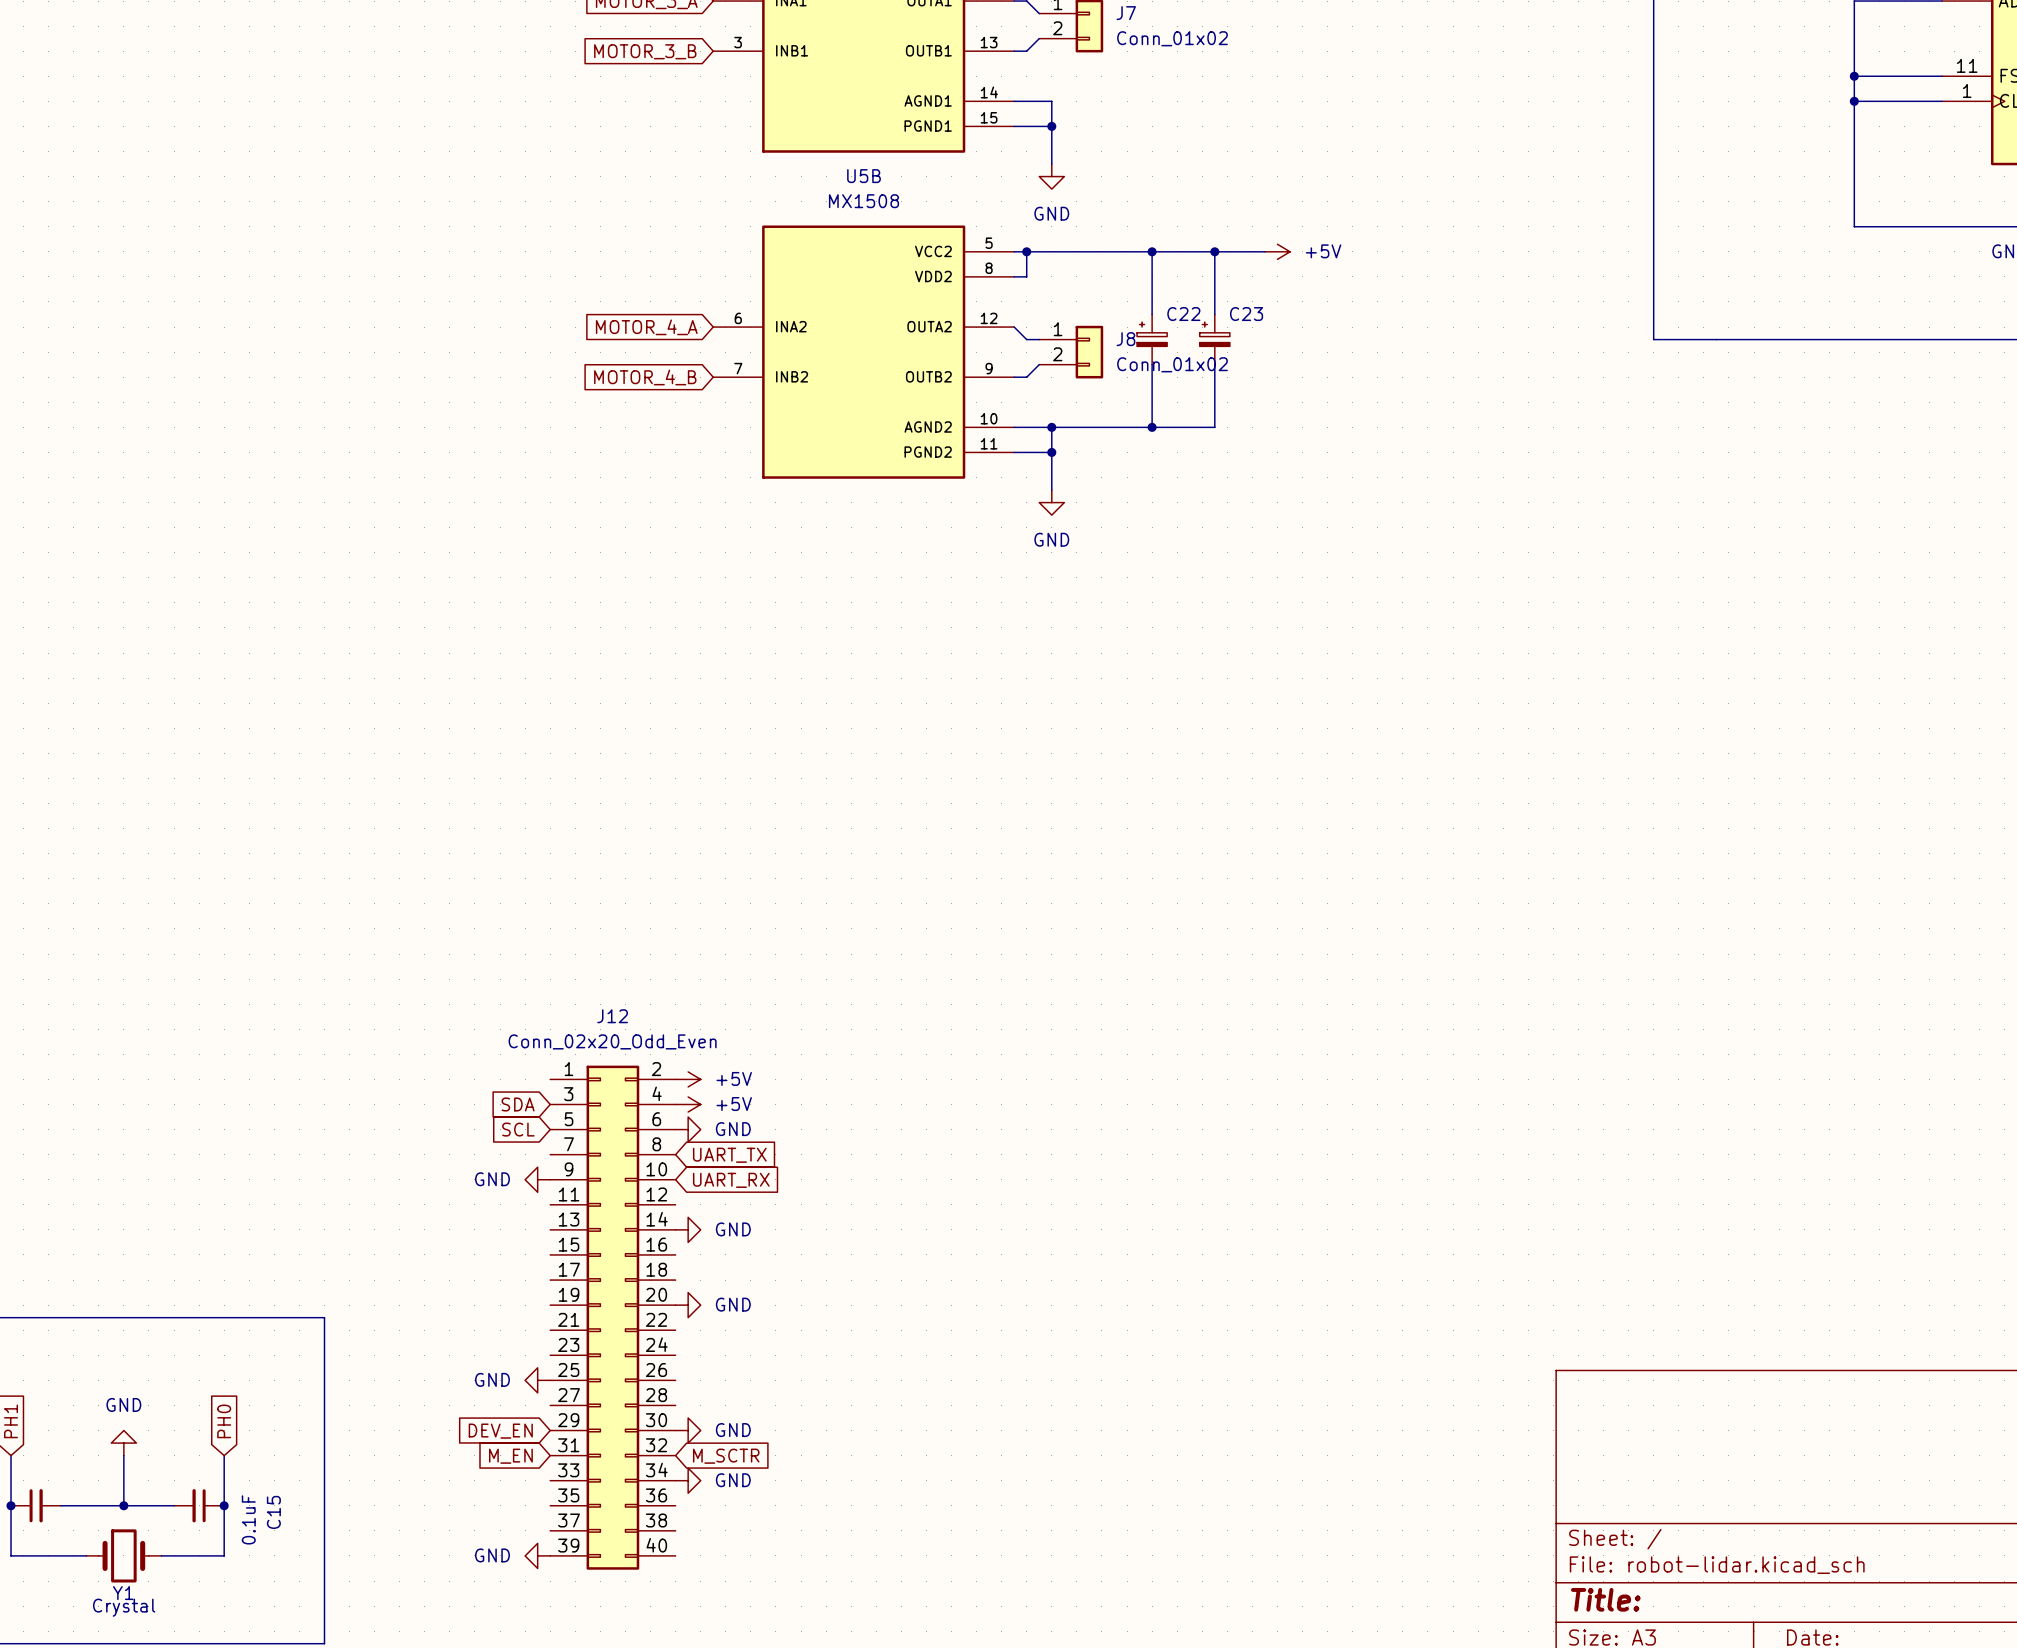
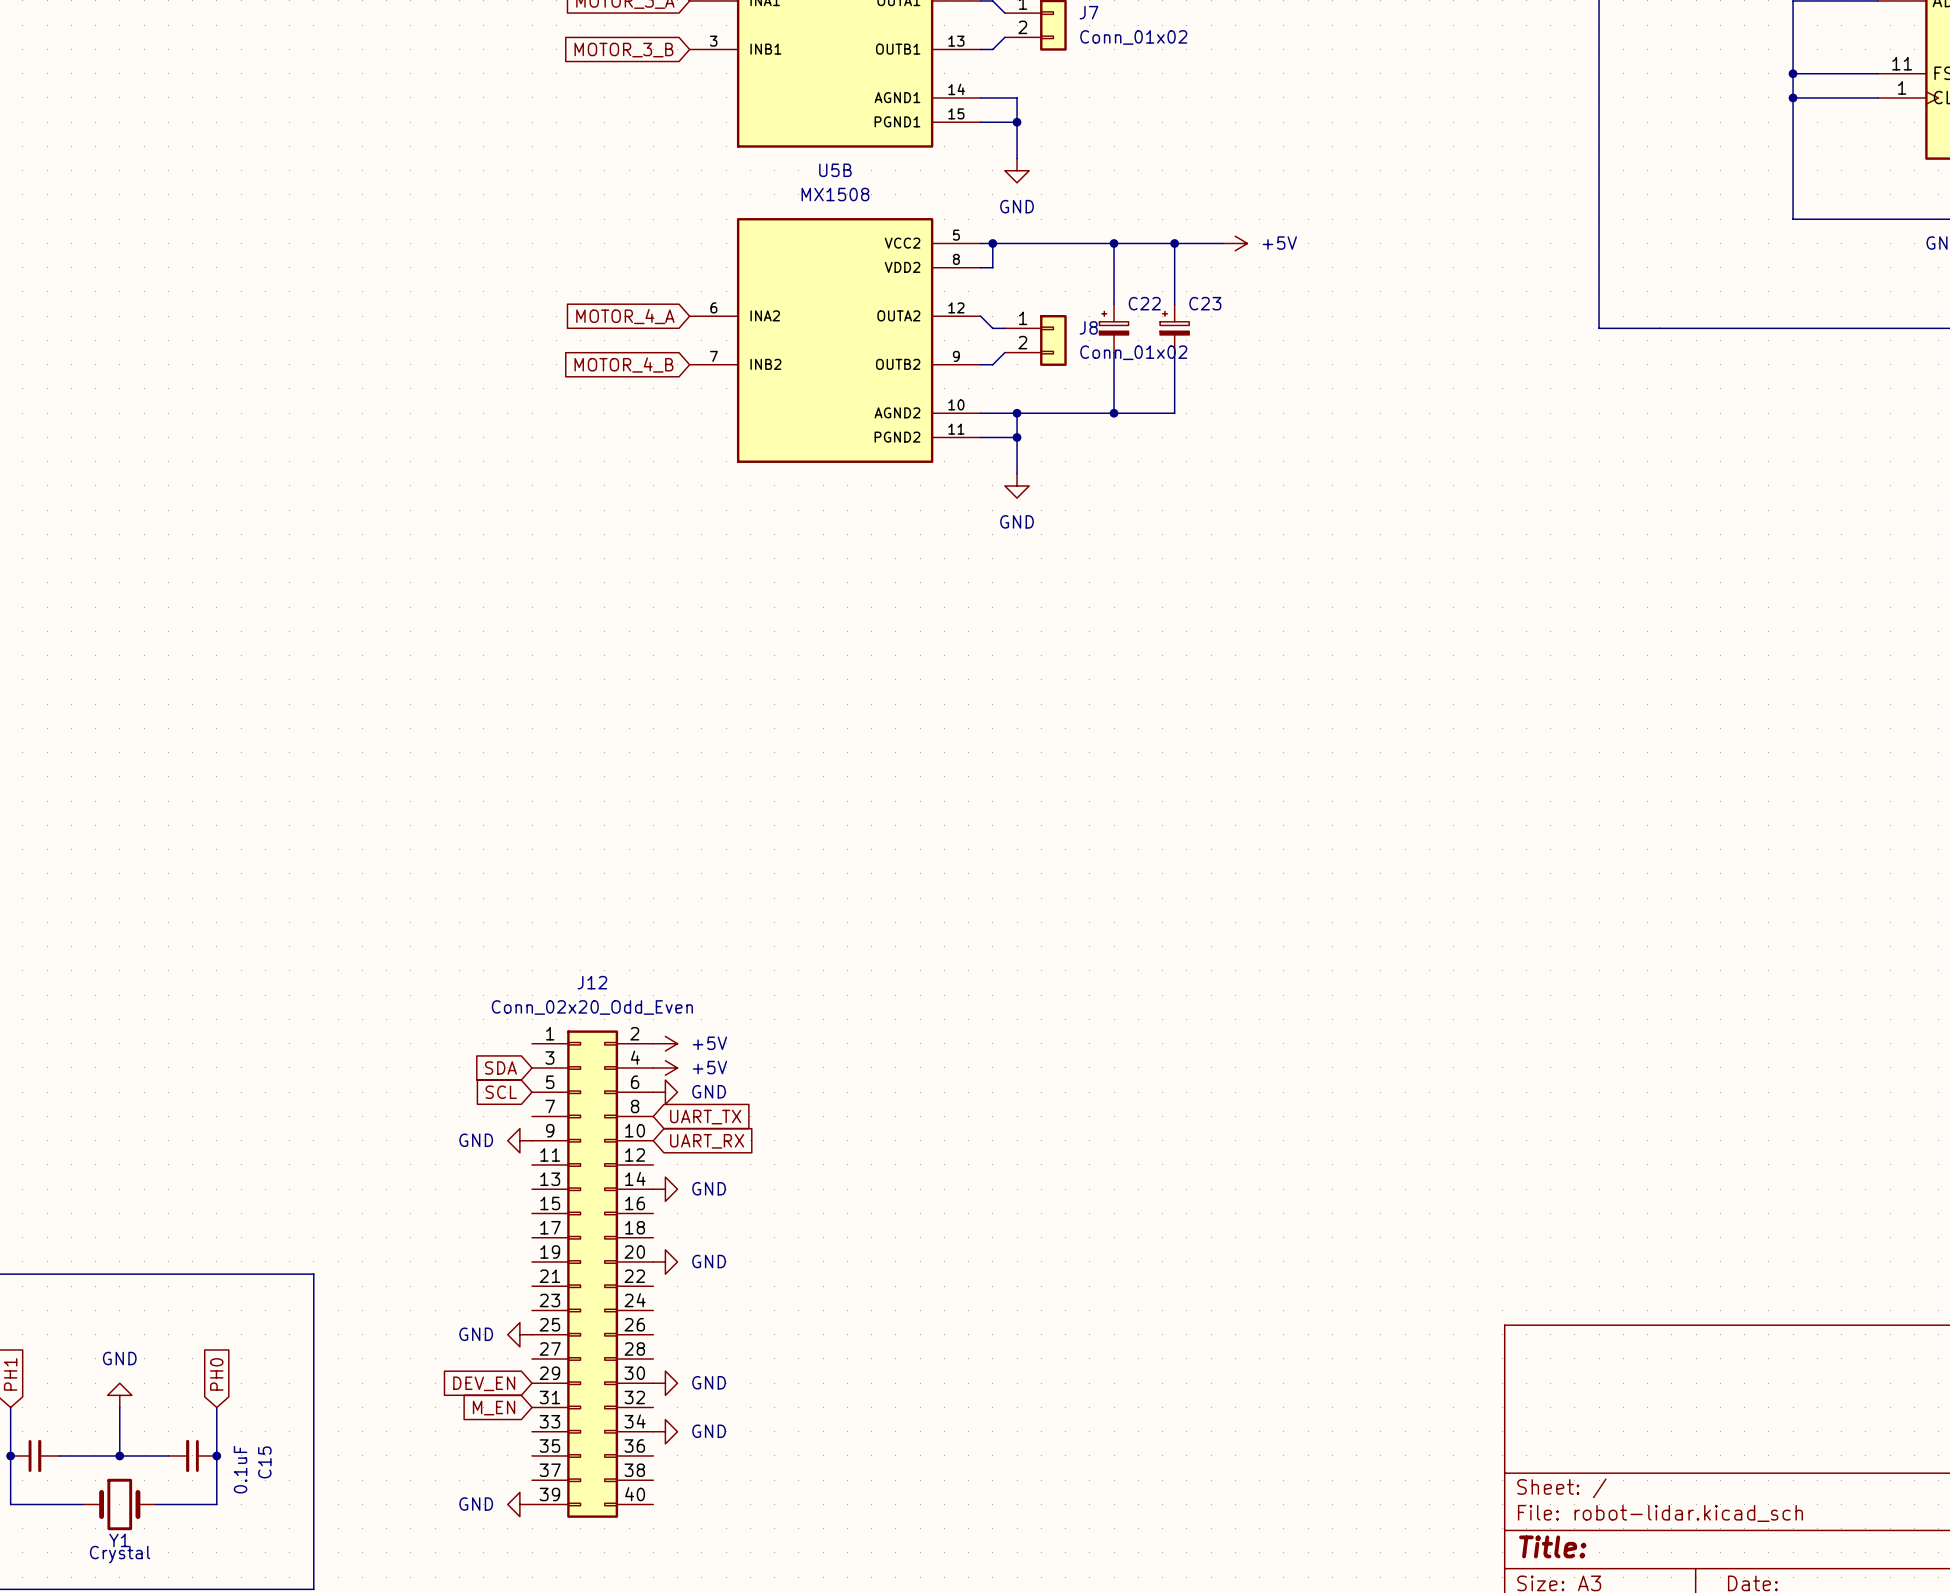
global label: M_SCTR (726, 1456) -> none

